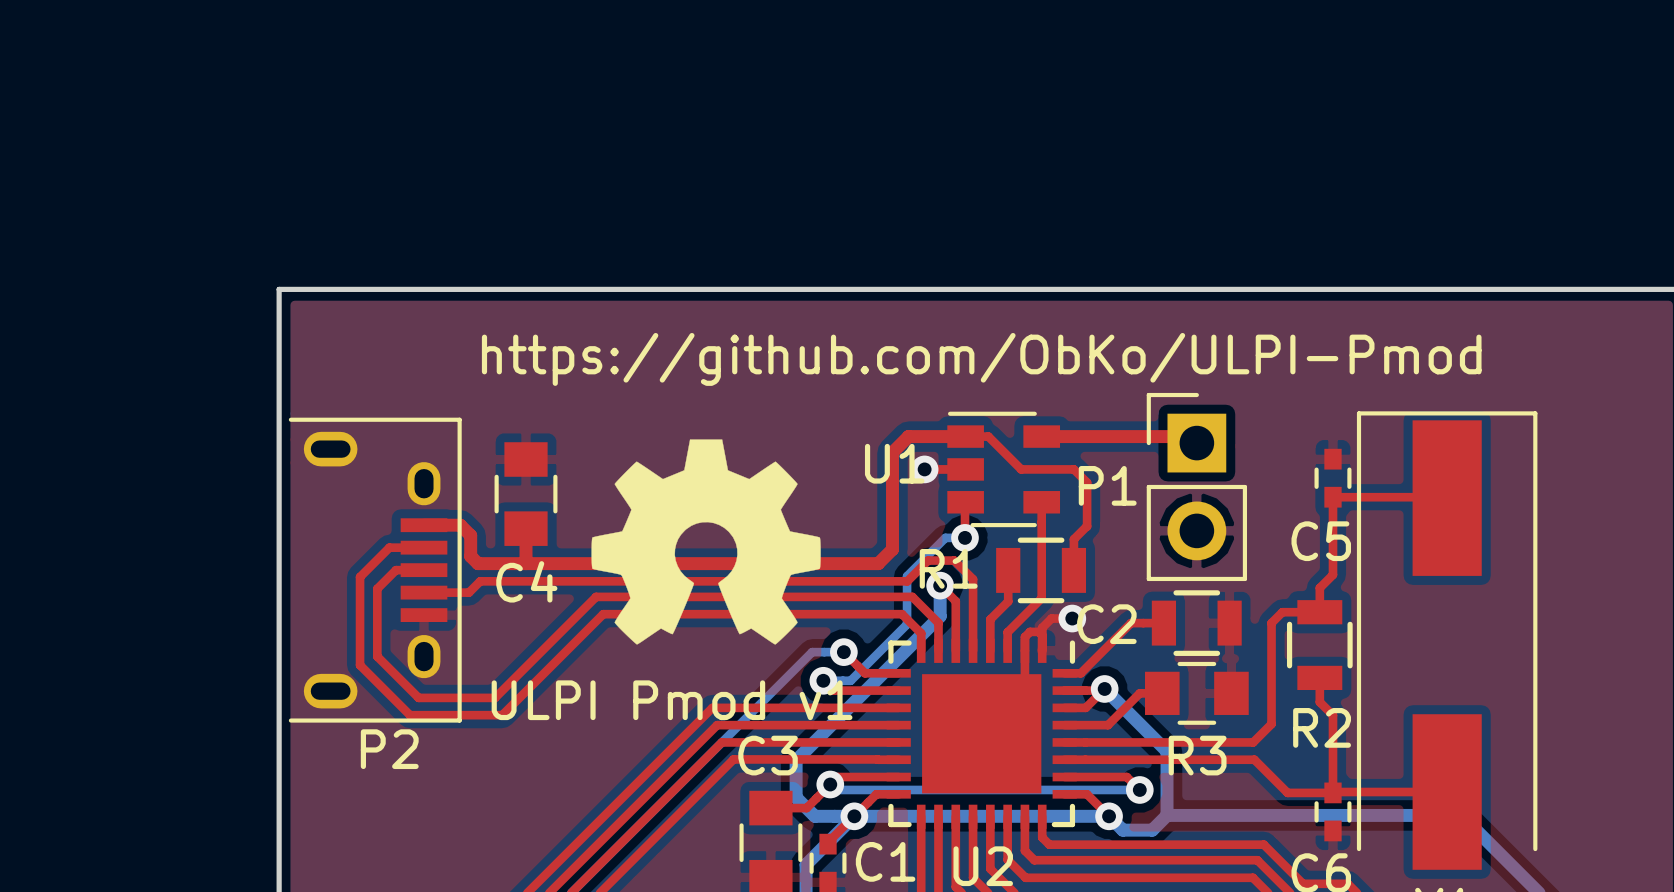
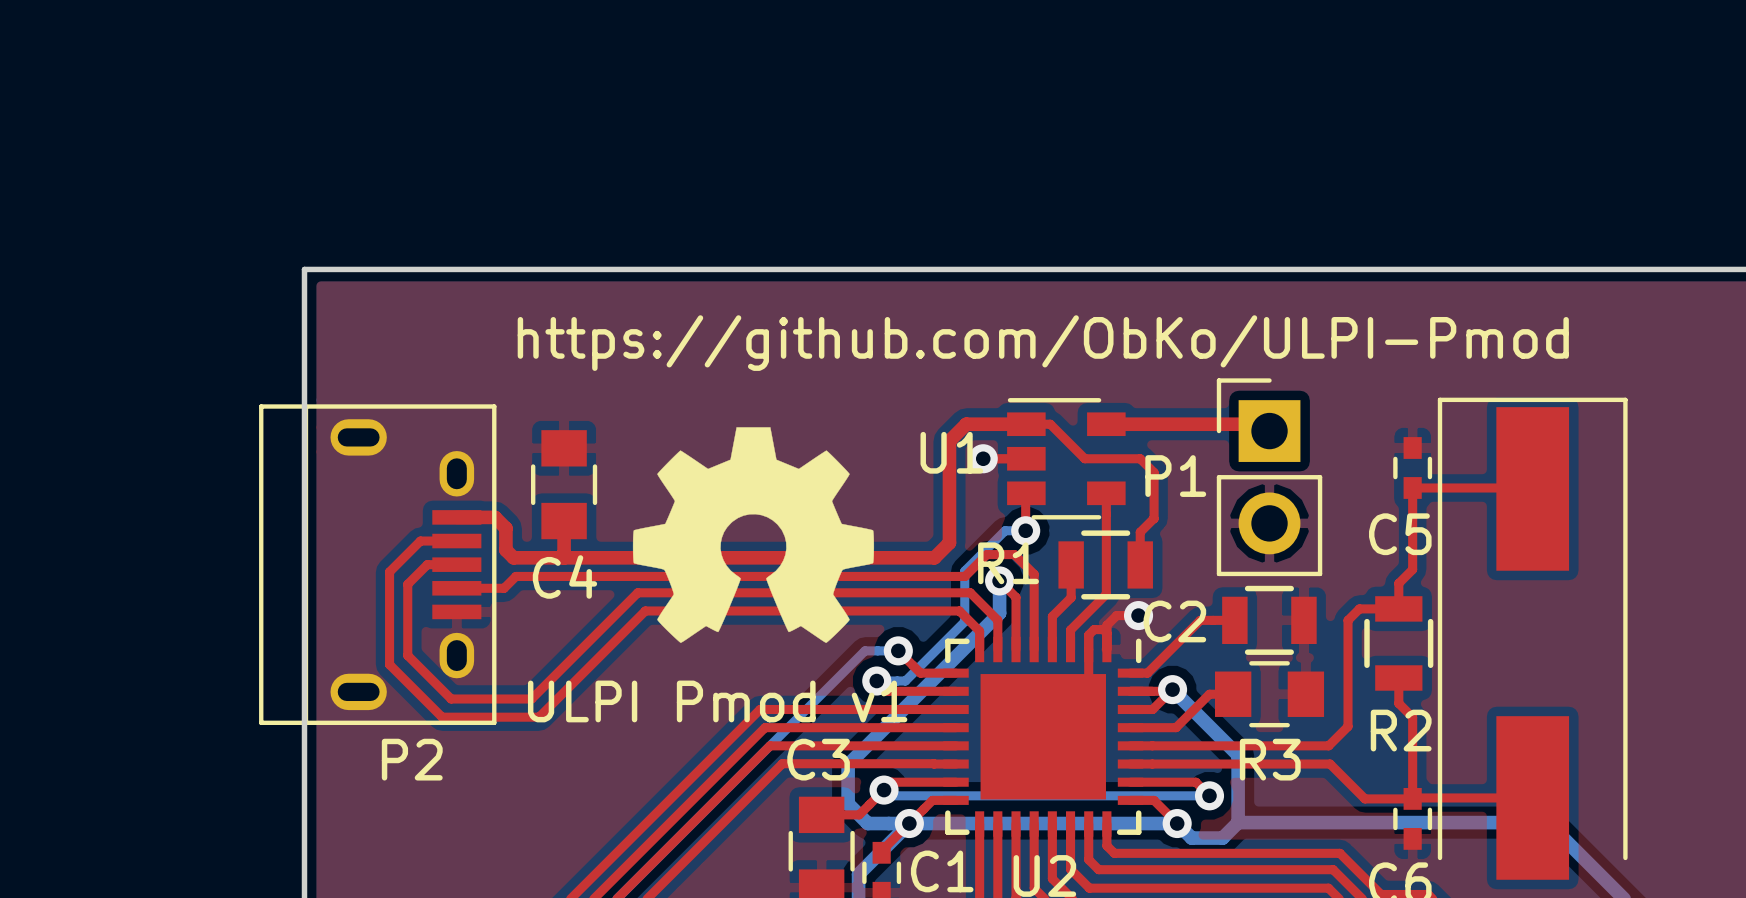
P2 footprint: [288, 417, 462, 723] -> [259, 404, 497, 726]

